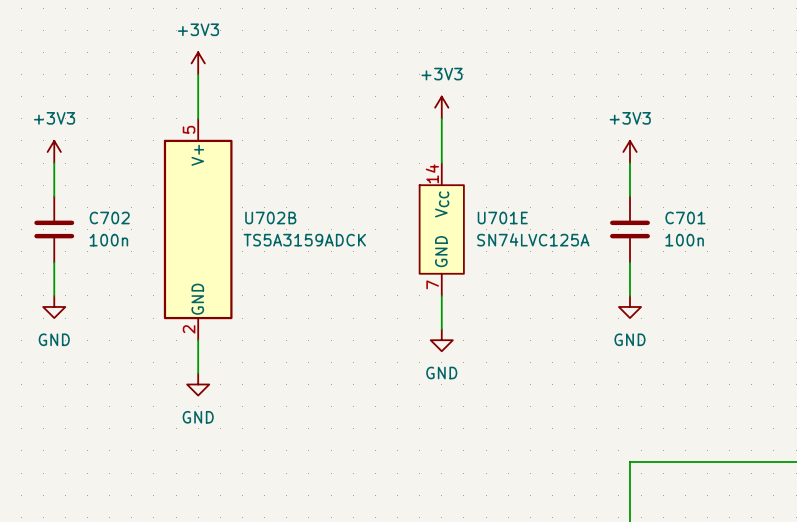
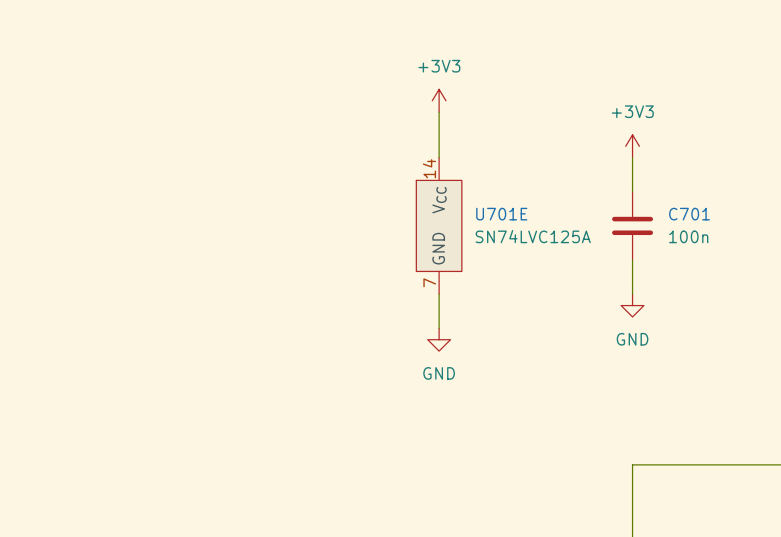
power symbol: +3V3 (198, 63) -> none
wire: (198, 74) (198, 118) -> none
power symbol: +3V3 (54, 151) -> none
wire: (54, 163) (54, 196) -> none
C702: 100n (54, 229) -> none
U702B: TS5A3159ADCK (198, 229) -> none
wire: (54, 262) (54, 295) -> none
power symbol: GND (54, 306) -> none
wire: (198, 340) (198, 373) -> none
power symbol: GND (198, 384) -> none

